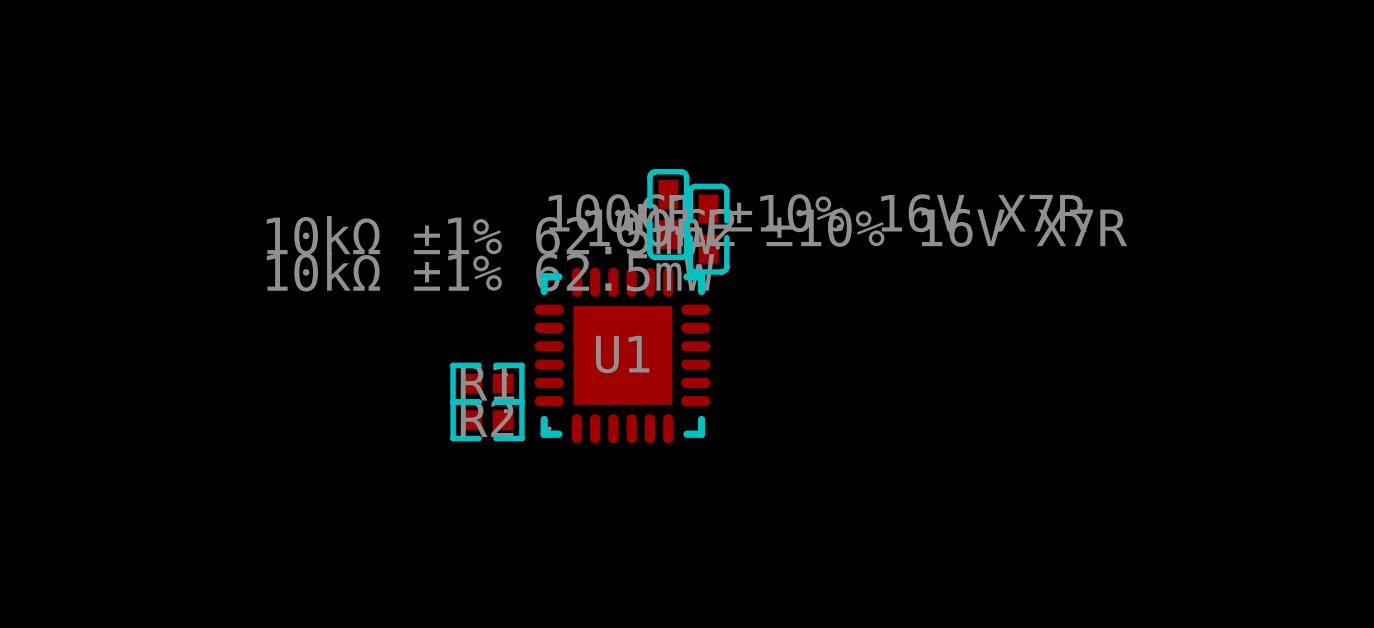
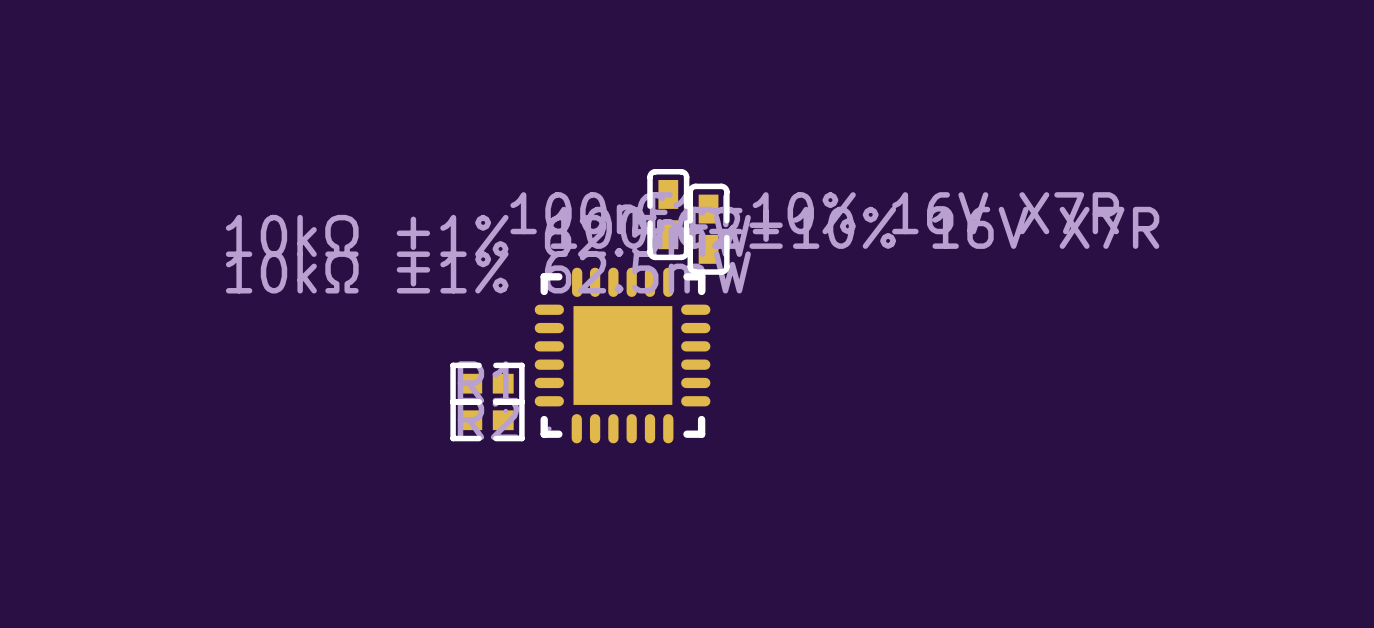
U1 name: U1 (622, 354) -> none

